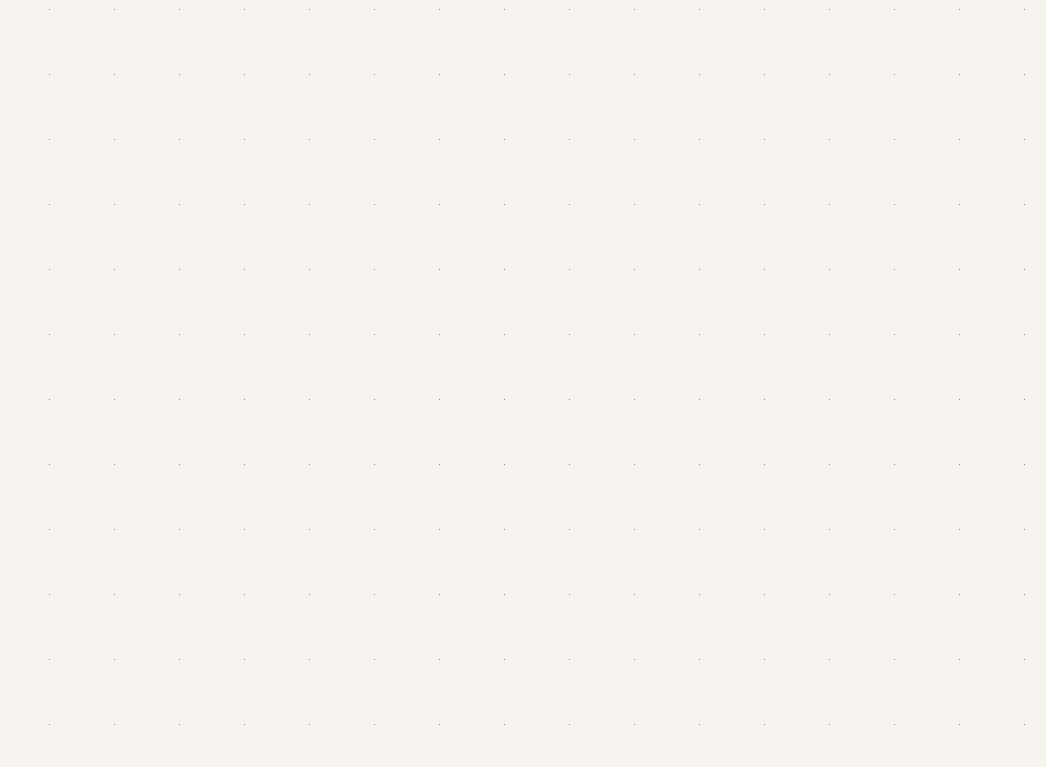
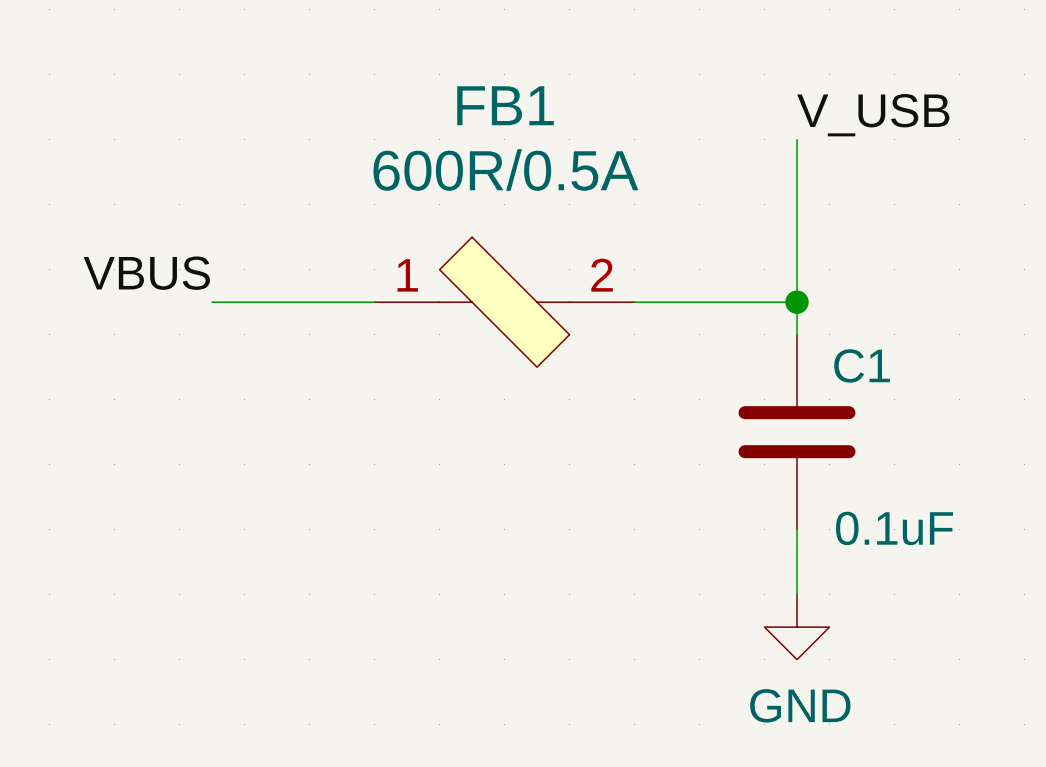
label: none -> V_USB (873, 115)
wire: none -> (797, 139) (797, 334)
label: none -> VBUS (146, 273)
wire: none -> (212, 302) (374, 302)
FB1: none -> 600R/0.5A (504, 302)
wire: none -> (634, 302) (797, 302)
junction: none -> (797, 302)
C1: none -> 0.1uF (797, 432)
wire: none -> (797, 529) (797, 594)
power symbol: none -> GND (797, 627)

